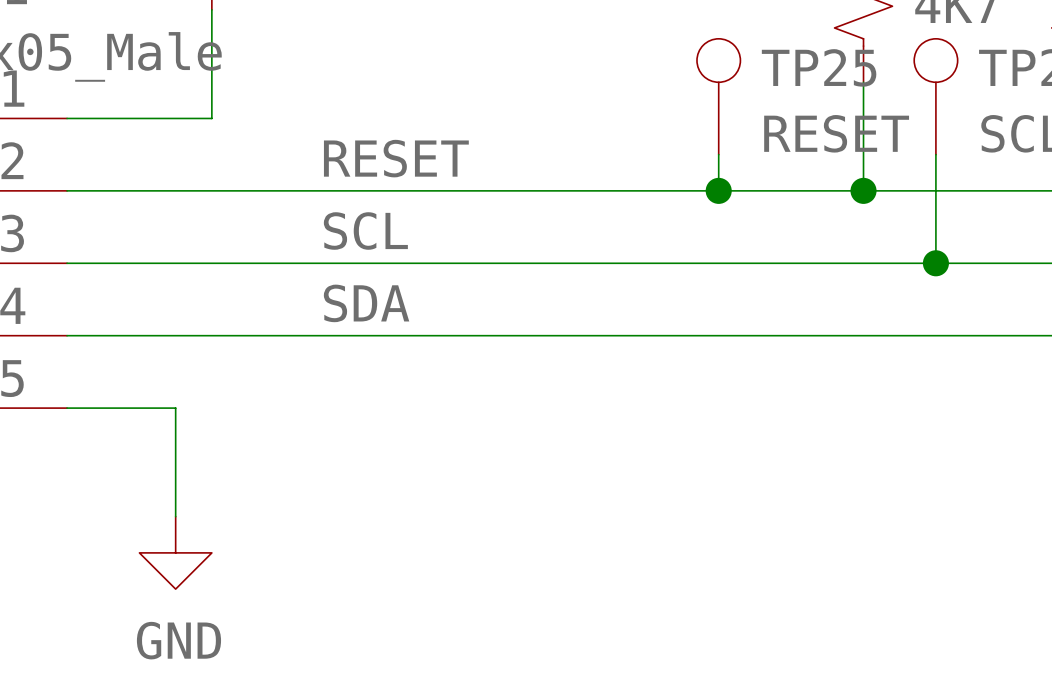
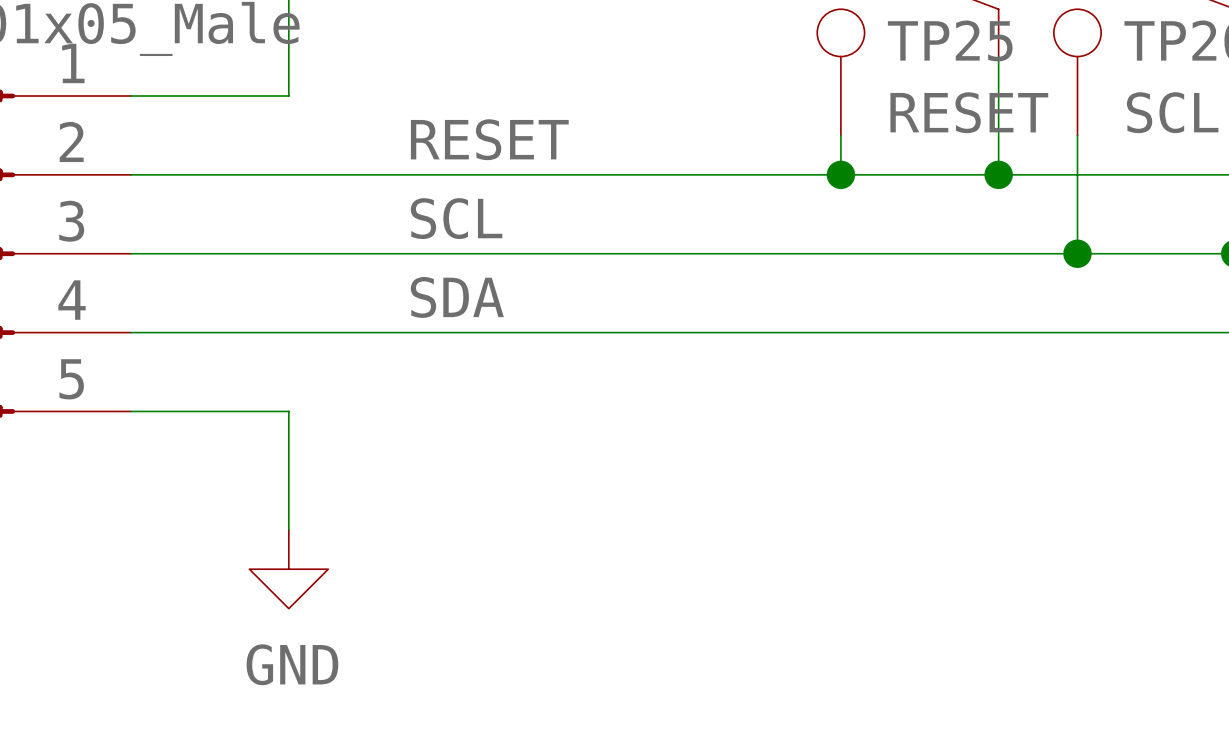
wire: (175, 408) (175, 516) -> (249, 411) (288, 411) (288, 529)
power symbol position: GND (175, 552) -> GND (288, 569)

